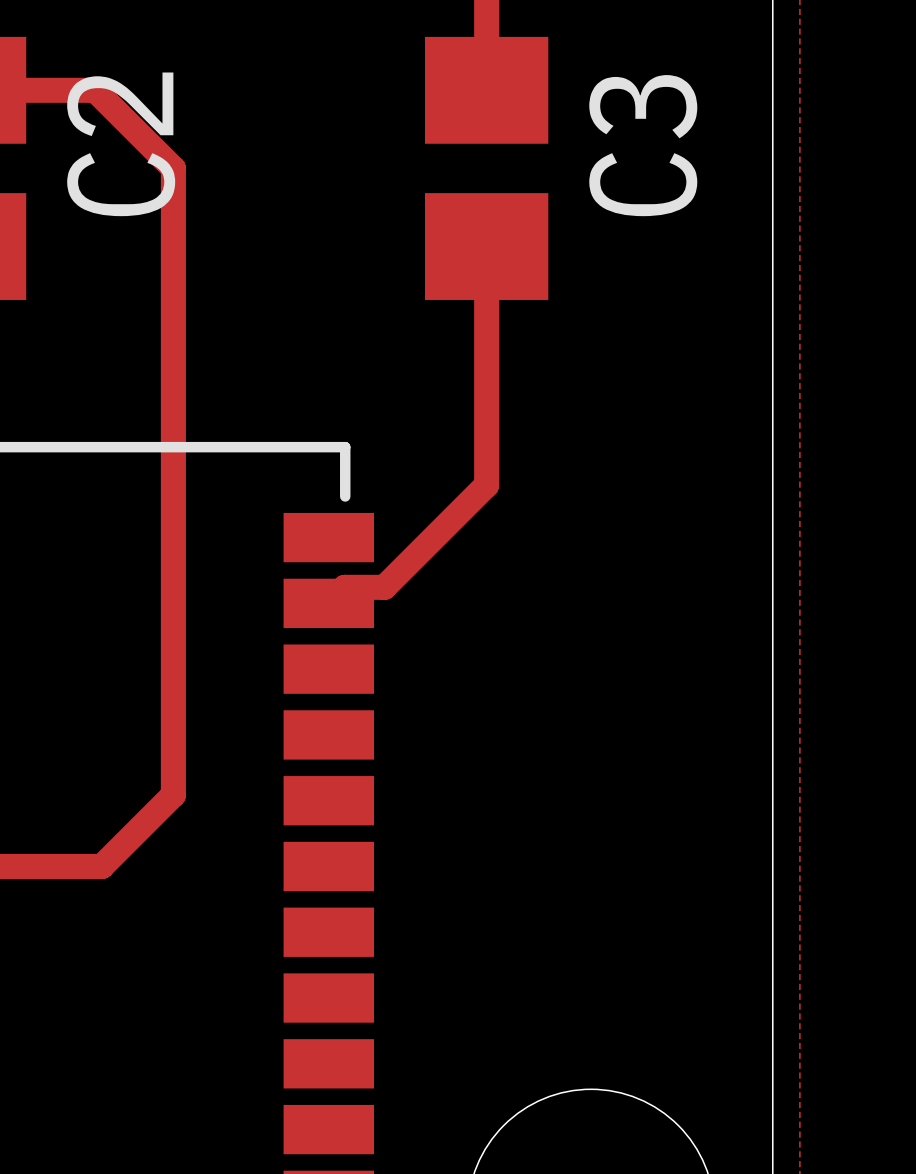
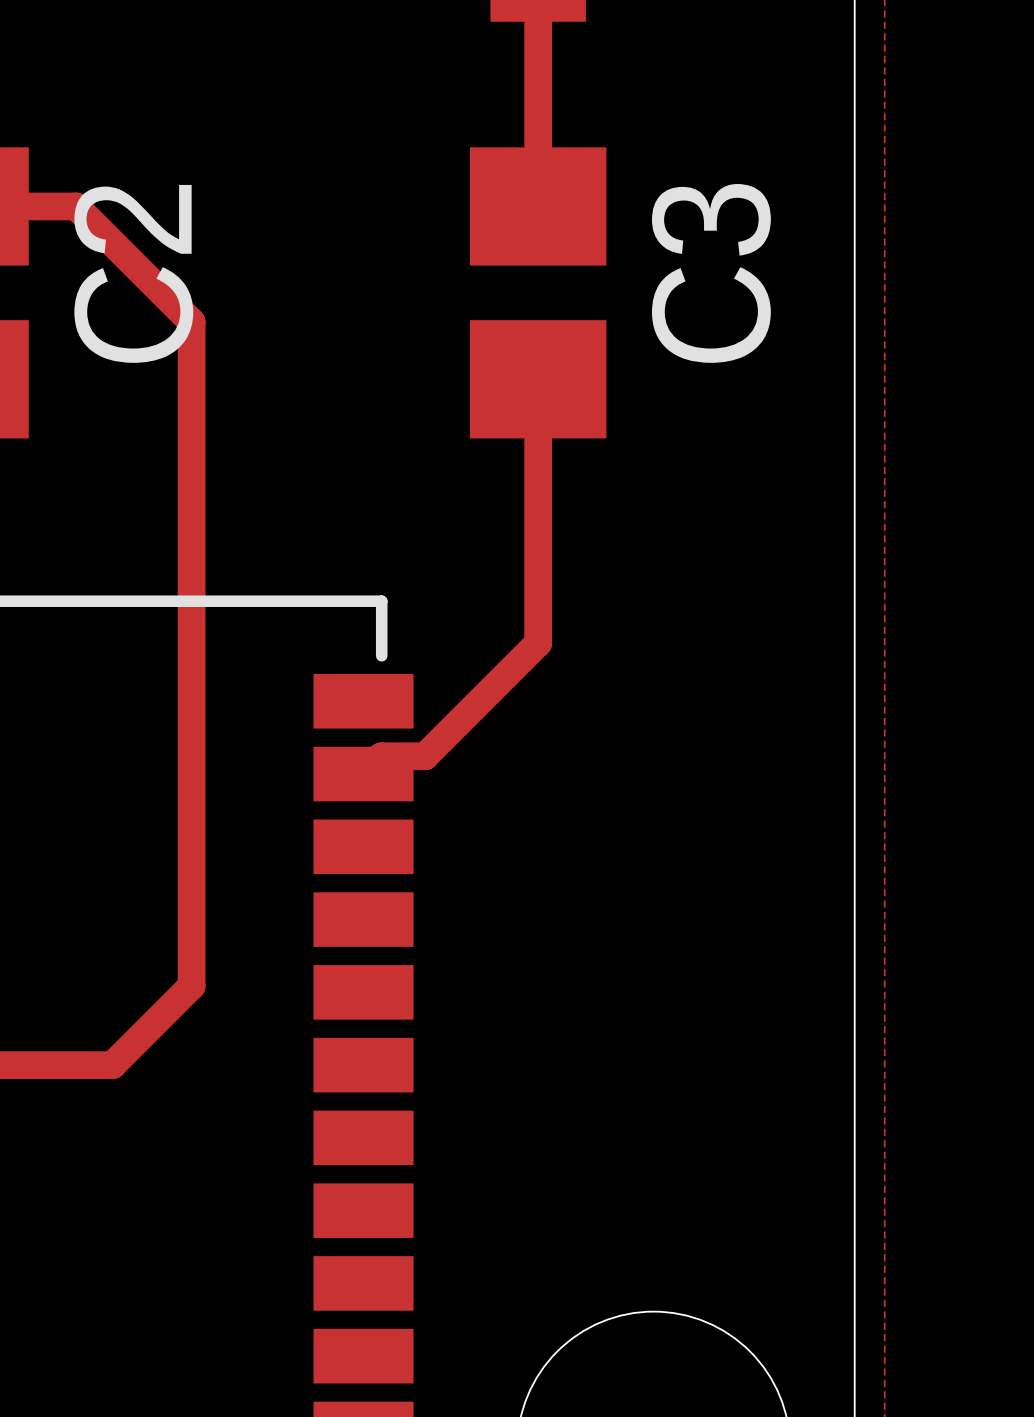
top track: (68, 90) (95, 90) (173, 168) (173, 194) -> (76, 206) (191, 321)

